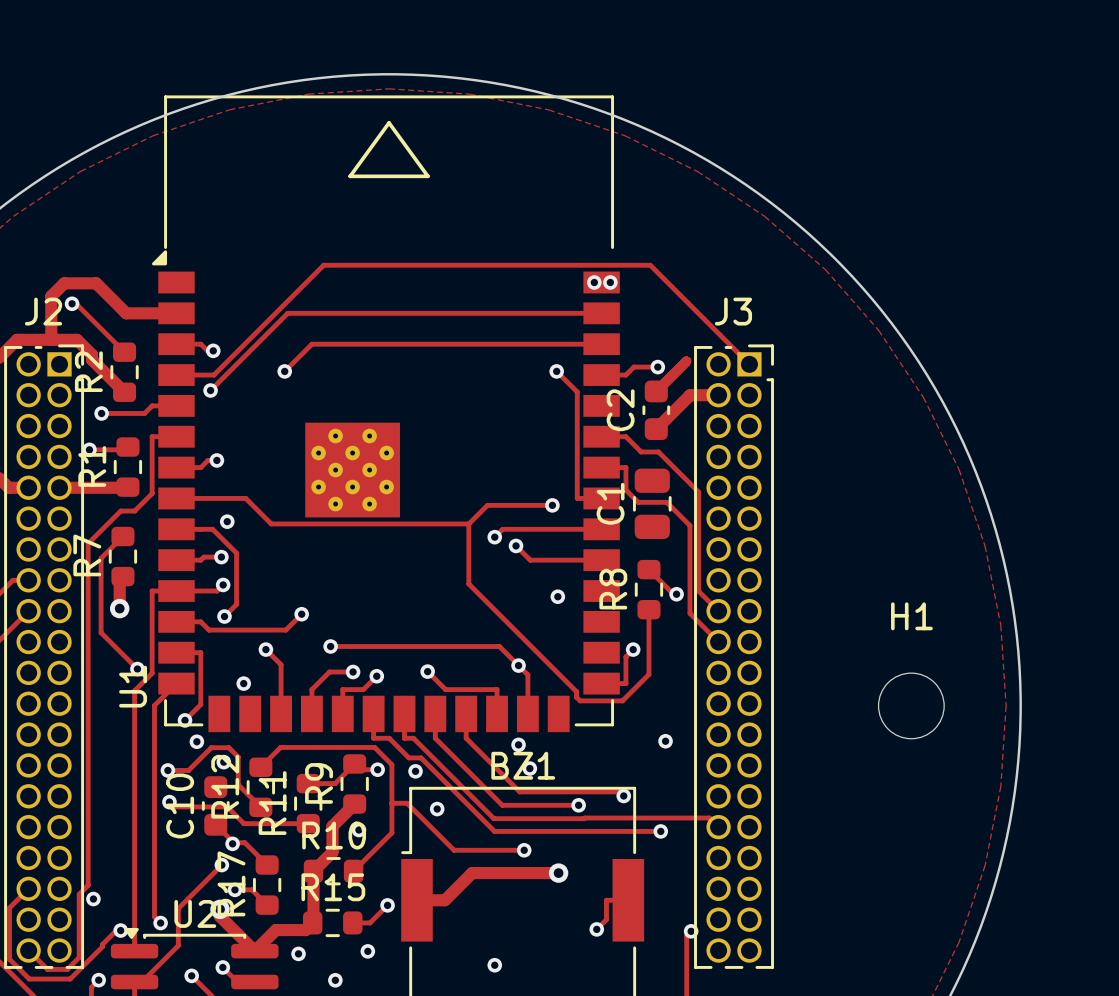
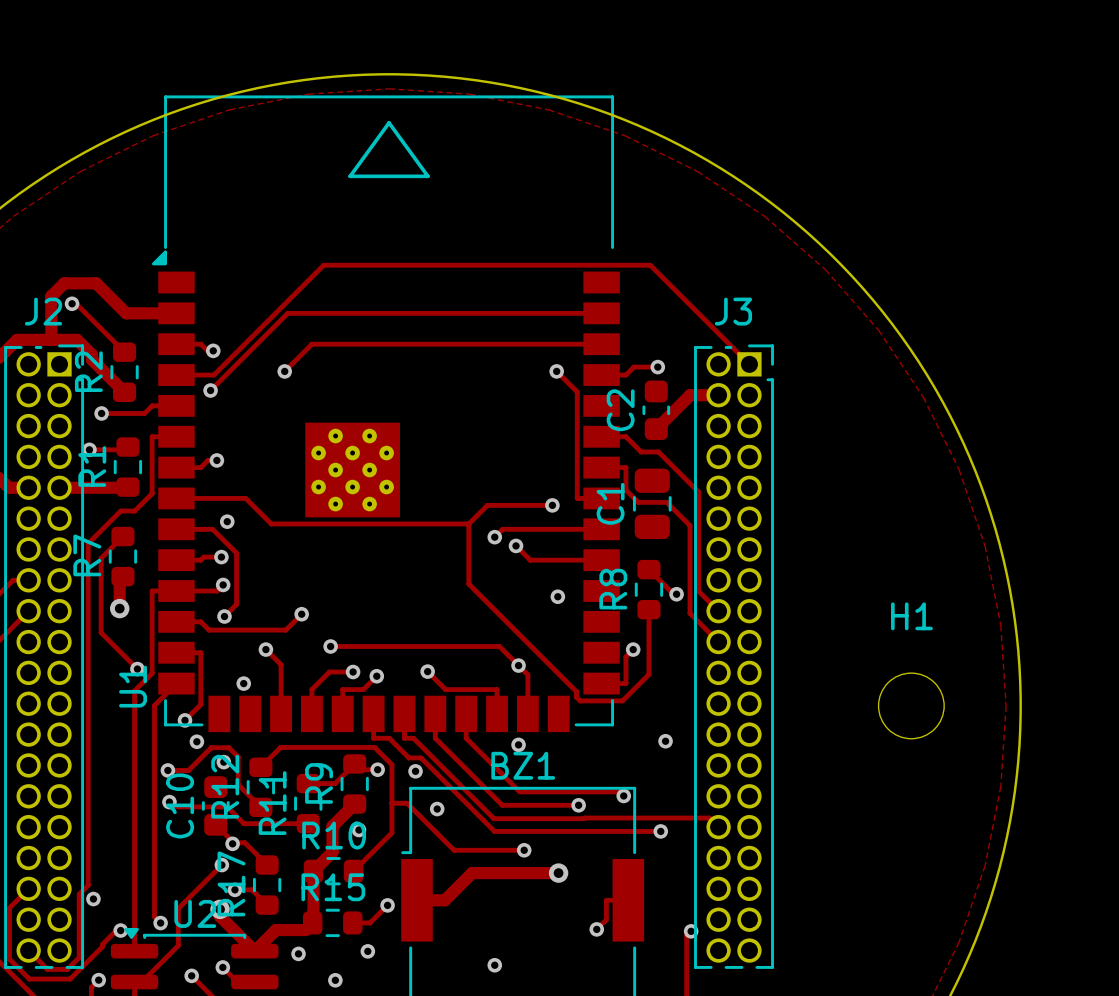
via: (594, 282) -> none
via: (610, 282) -> none
track: (686, 361) (656, 391) -> none
via: (529, 768) -> none

